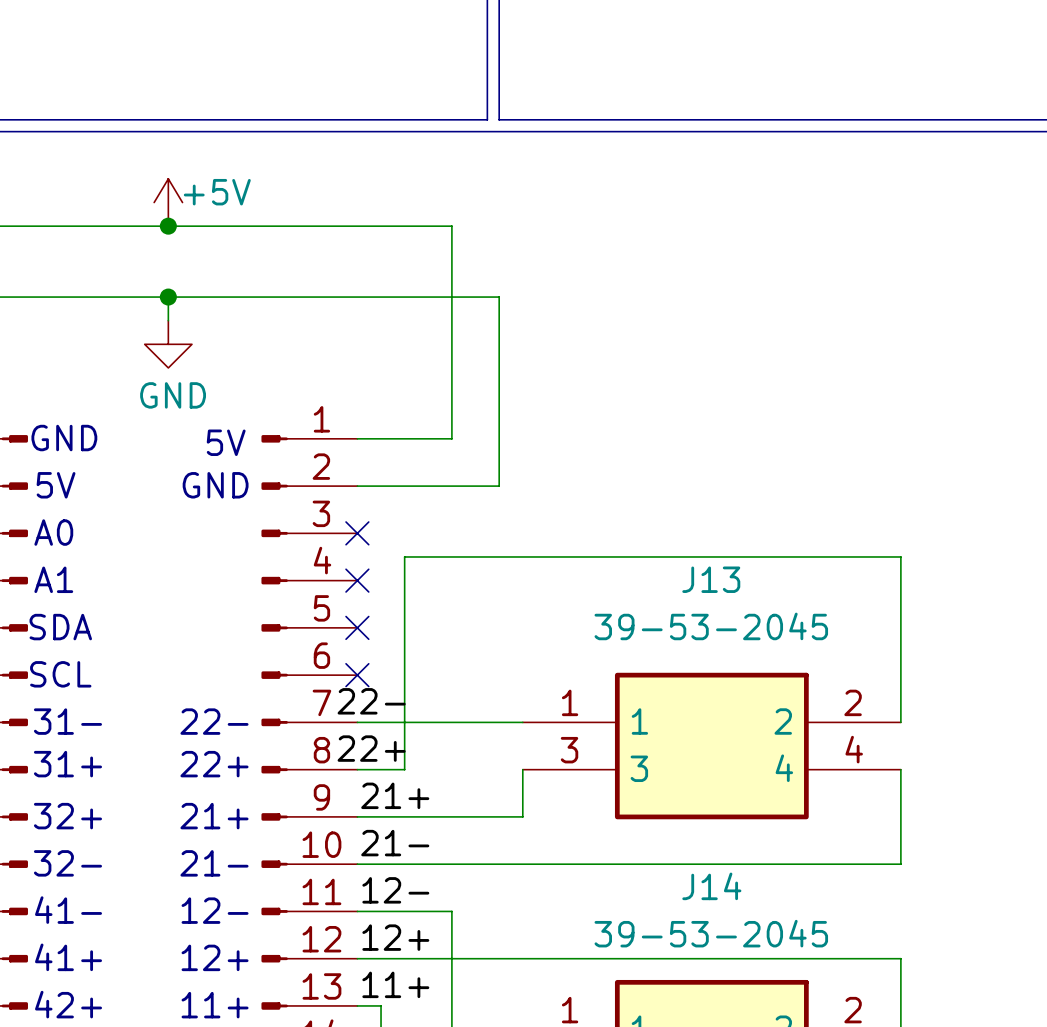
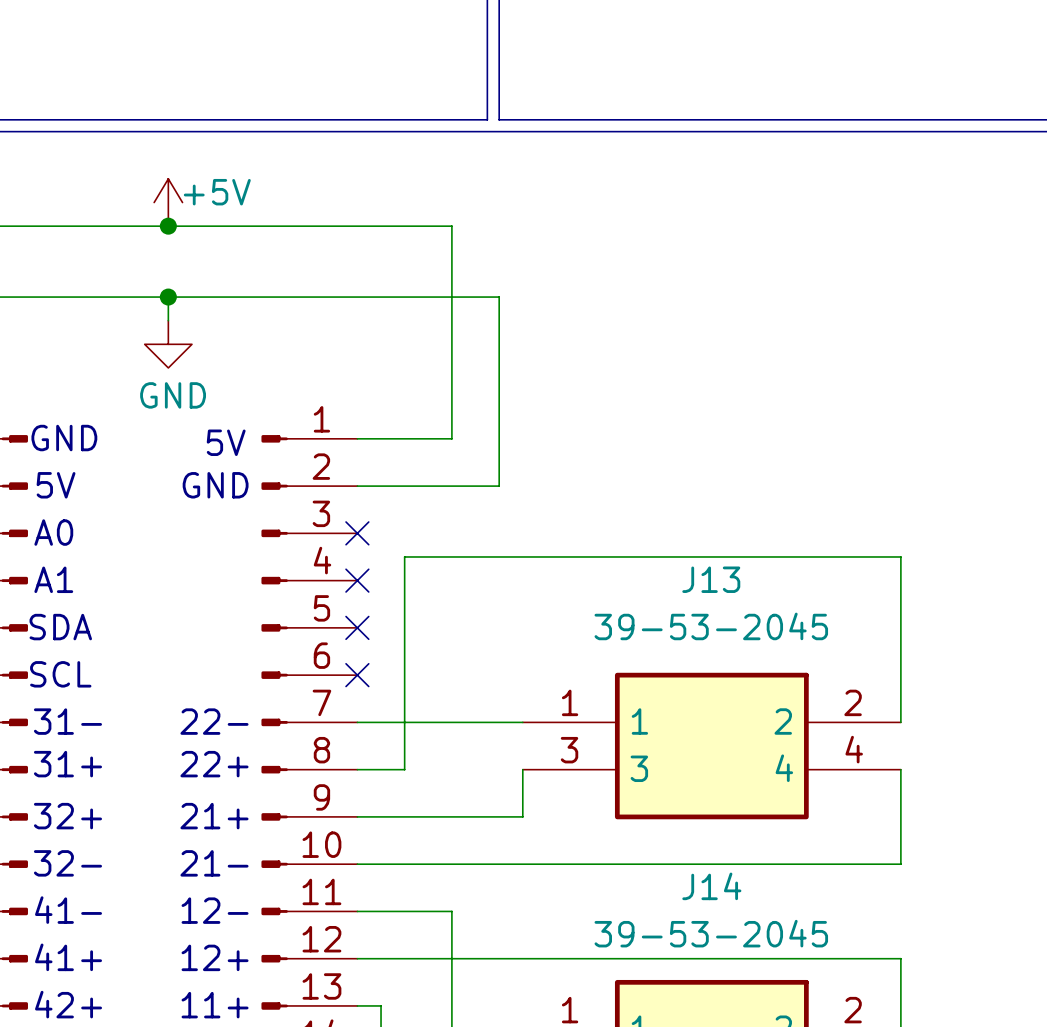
label: 22- (371, 701) -> none
label: 22+ (371, 748) -> none
label: 21+ (395, 795) -> none
label: 21- (395, 843) -> none
label: 12- (395, 890) -> none
label: 12+ (395, 937) -> none
label: 11+ (395, 984) -> none

